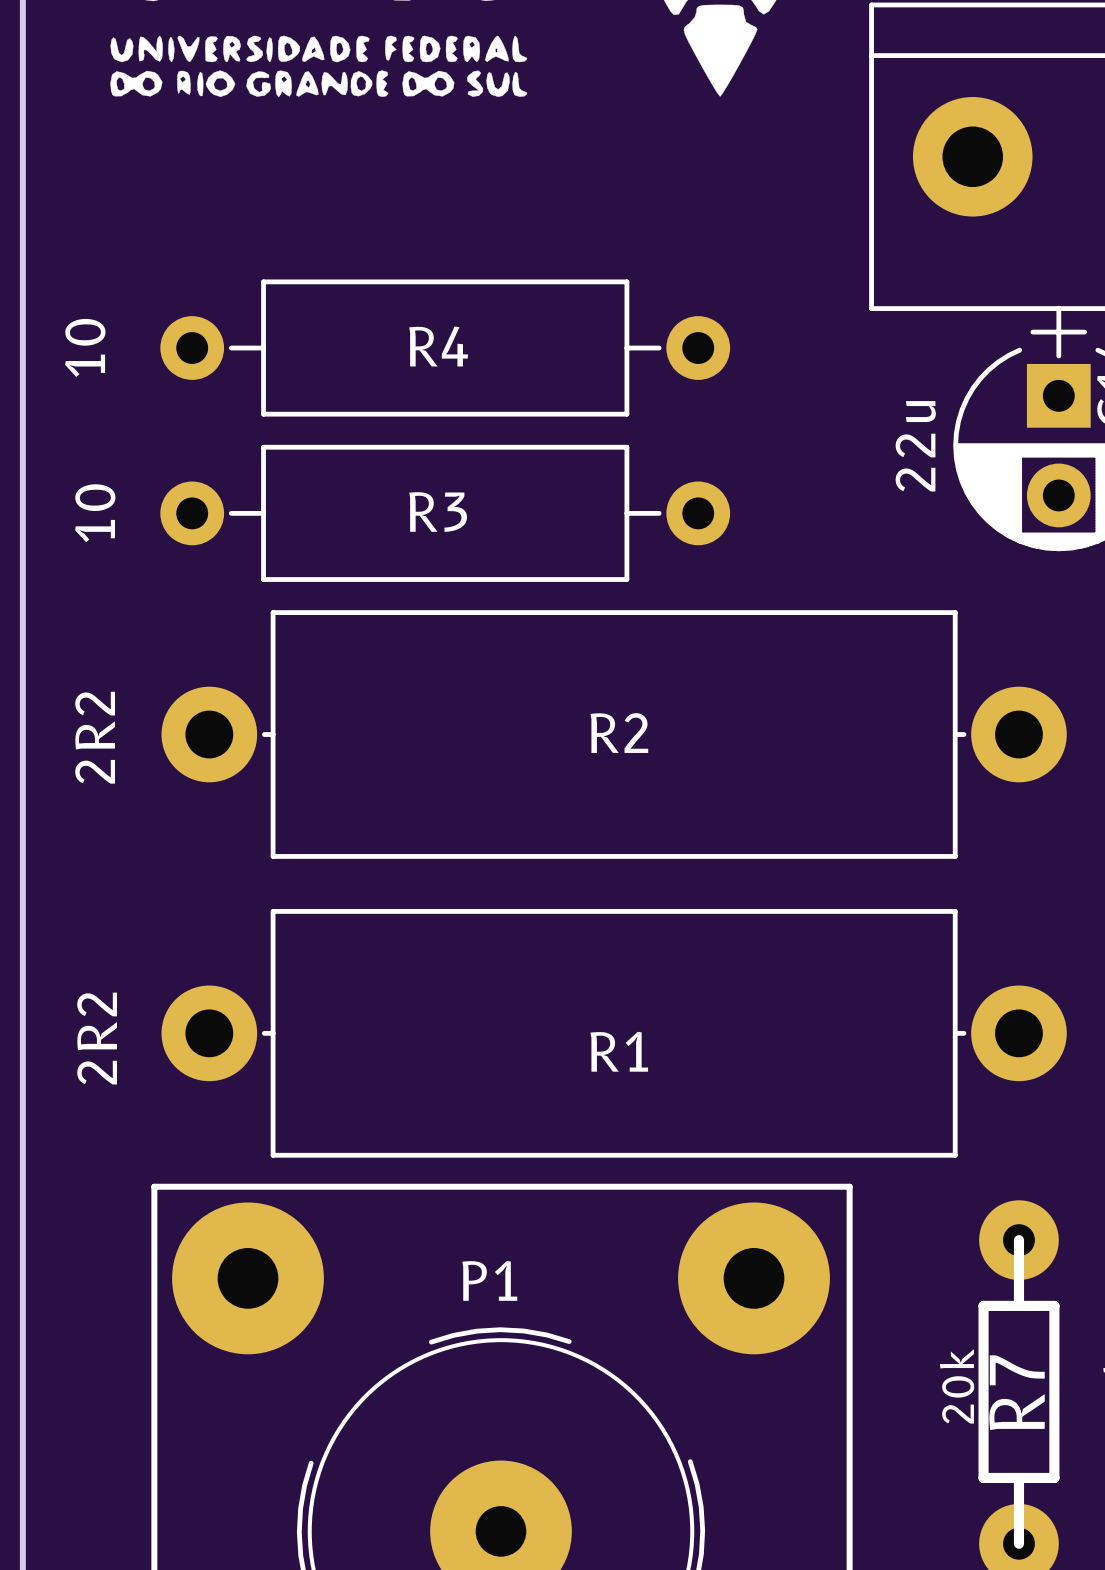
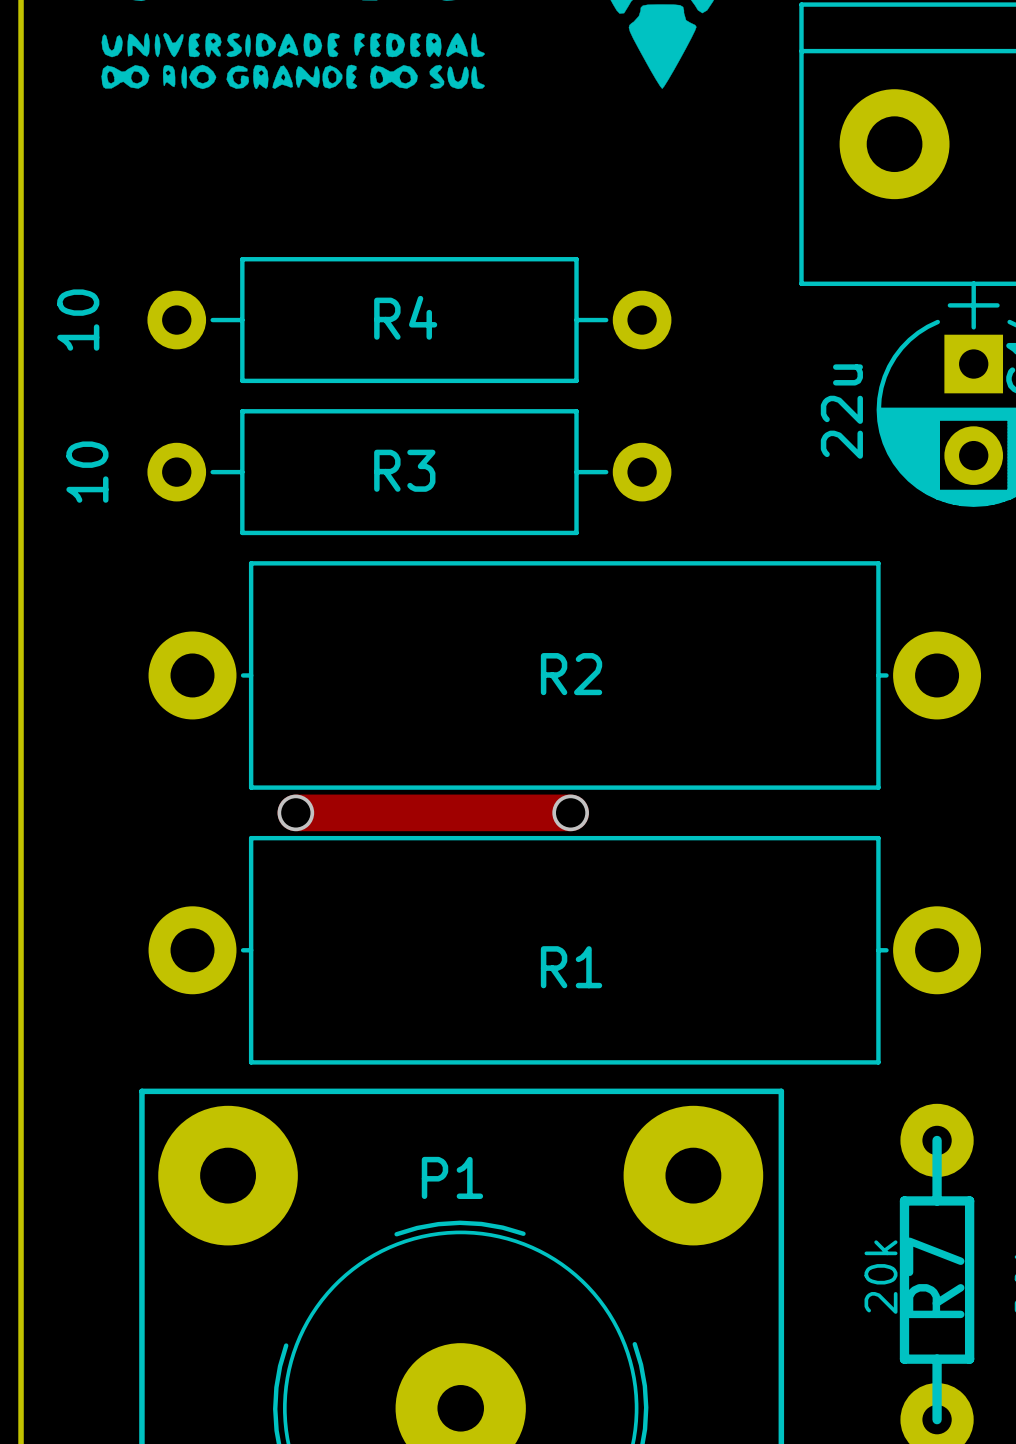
R2 value: 2R2 (95, 737) -> none
track: none -> (295, 812) (570, 812)
via: none -> (295, 812)
via: none -> (570, 812)
R1 value: 2R2 (97, 1038) -> none

